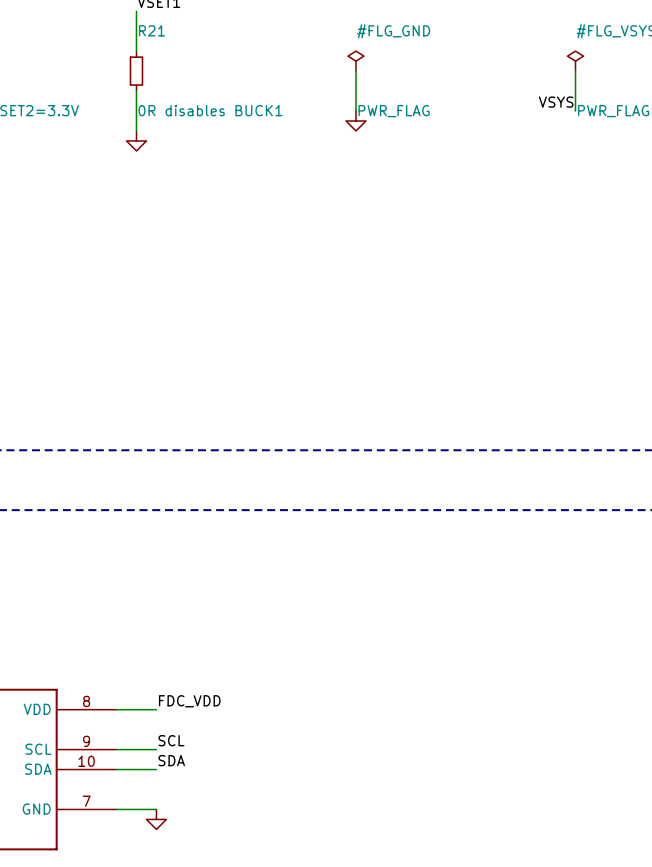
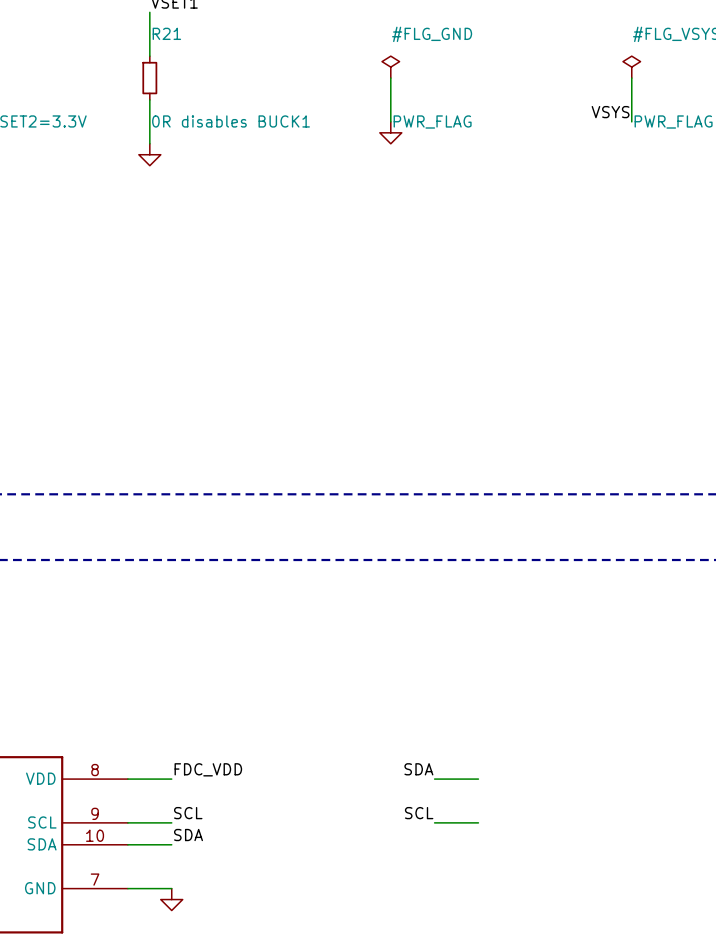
label: none -> SDA (418, 769)
wire: none -> (434, 779) (478, 779)
label: none -> SCL (419, 813)
wire: none -> (434, 822) (478, 822)

